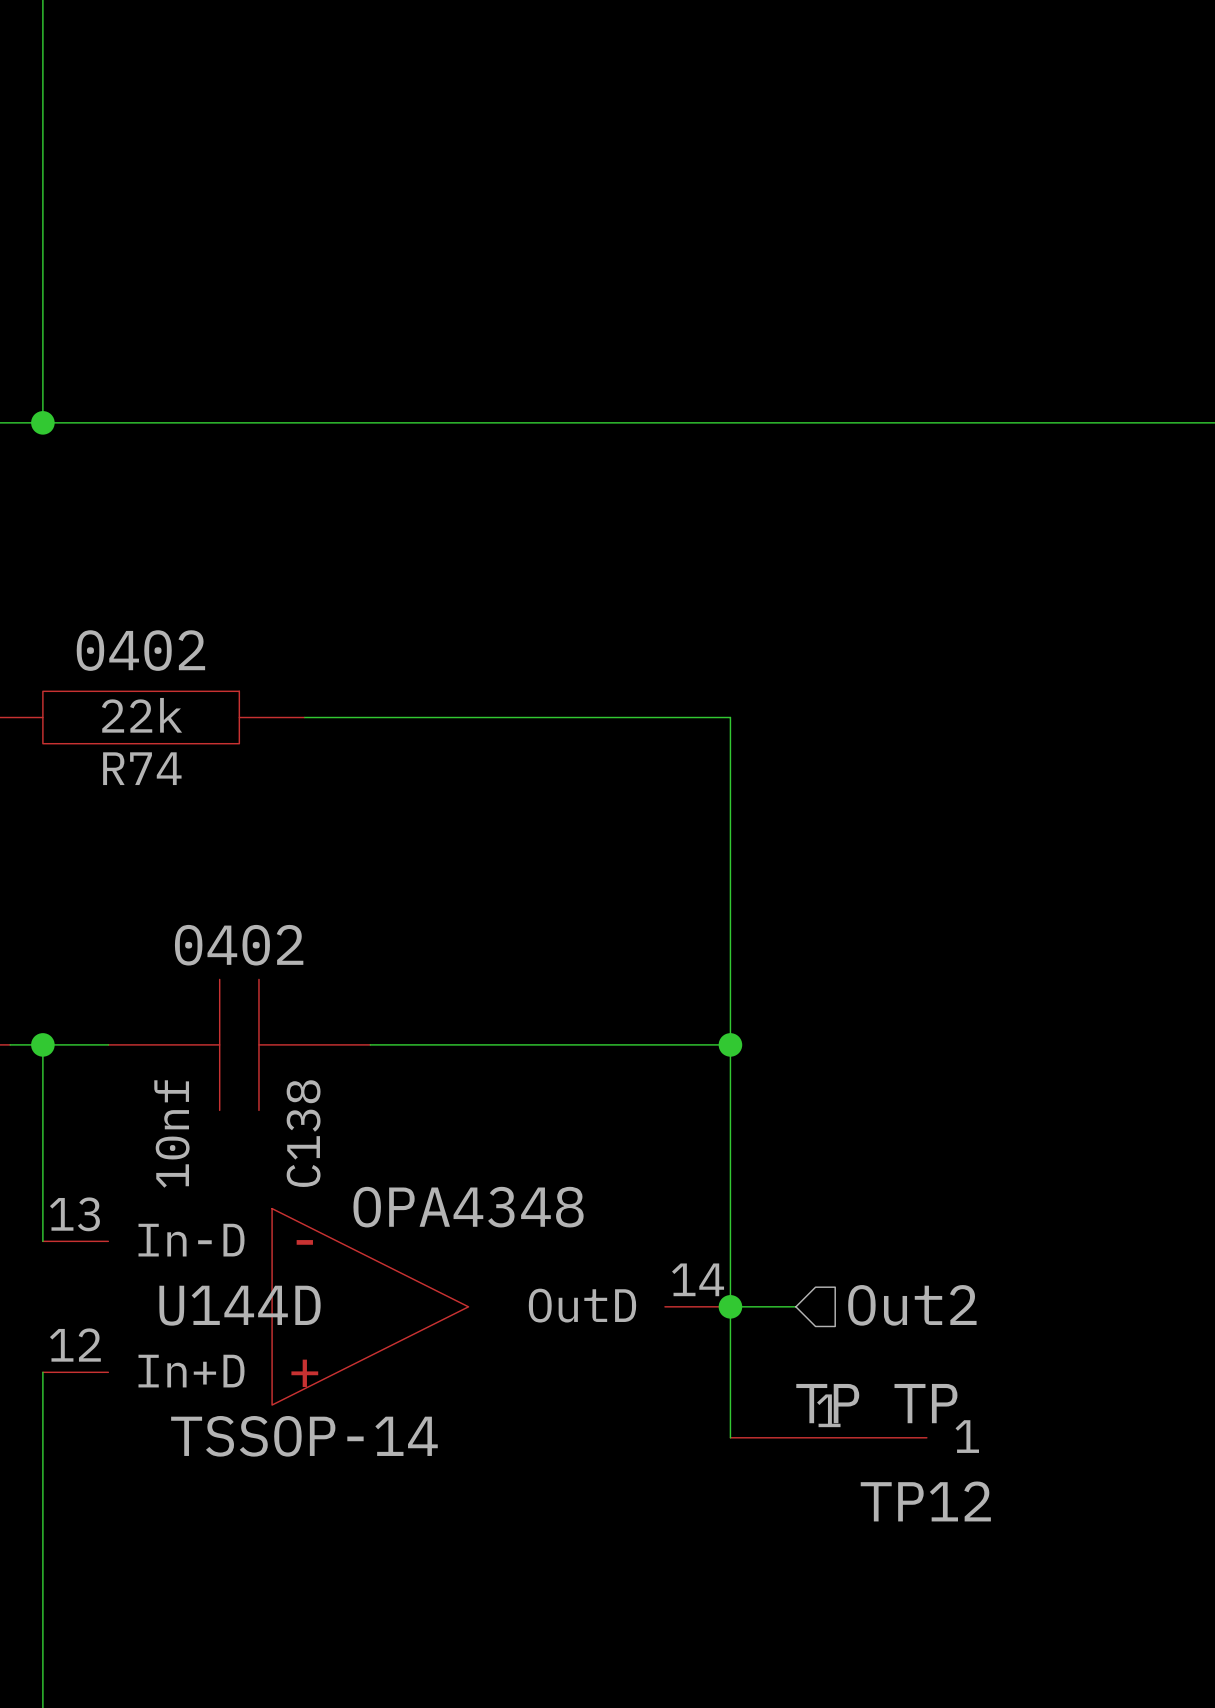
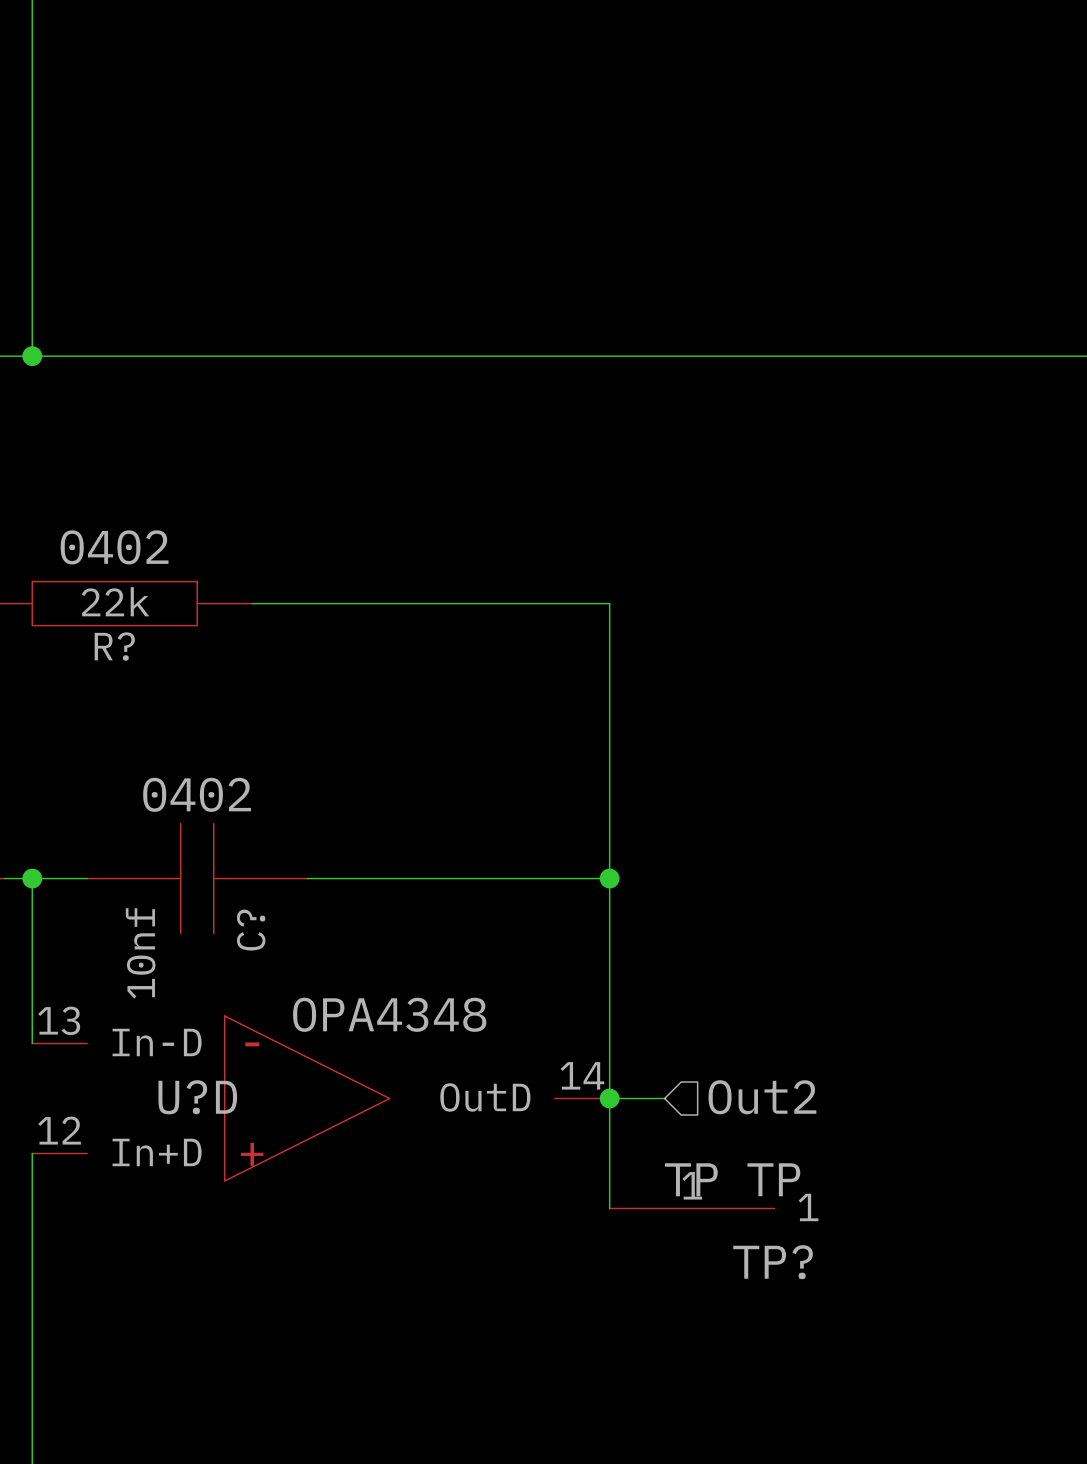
R74 name: R74 (142, 768) -> R? (114, 646)
C138 name: C138 (303, 1133) -> C? (251, 930)
U144D name: U144D (240, 1305) -> U?D (197, 1097)
U144D text: TSSOP-14 (304, 1436) -> none
TP12 name: TP12 (925, 1501) -> TP? (773, 1262)

